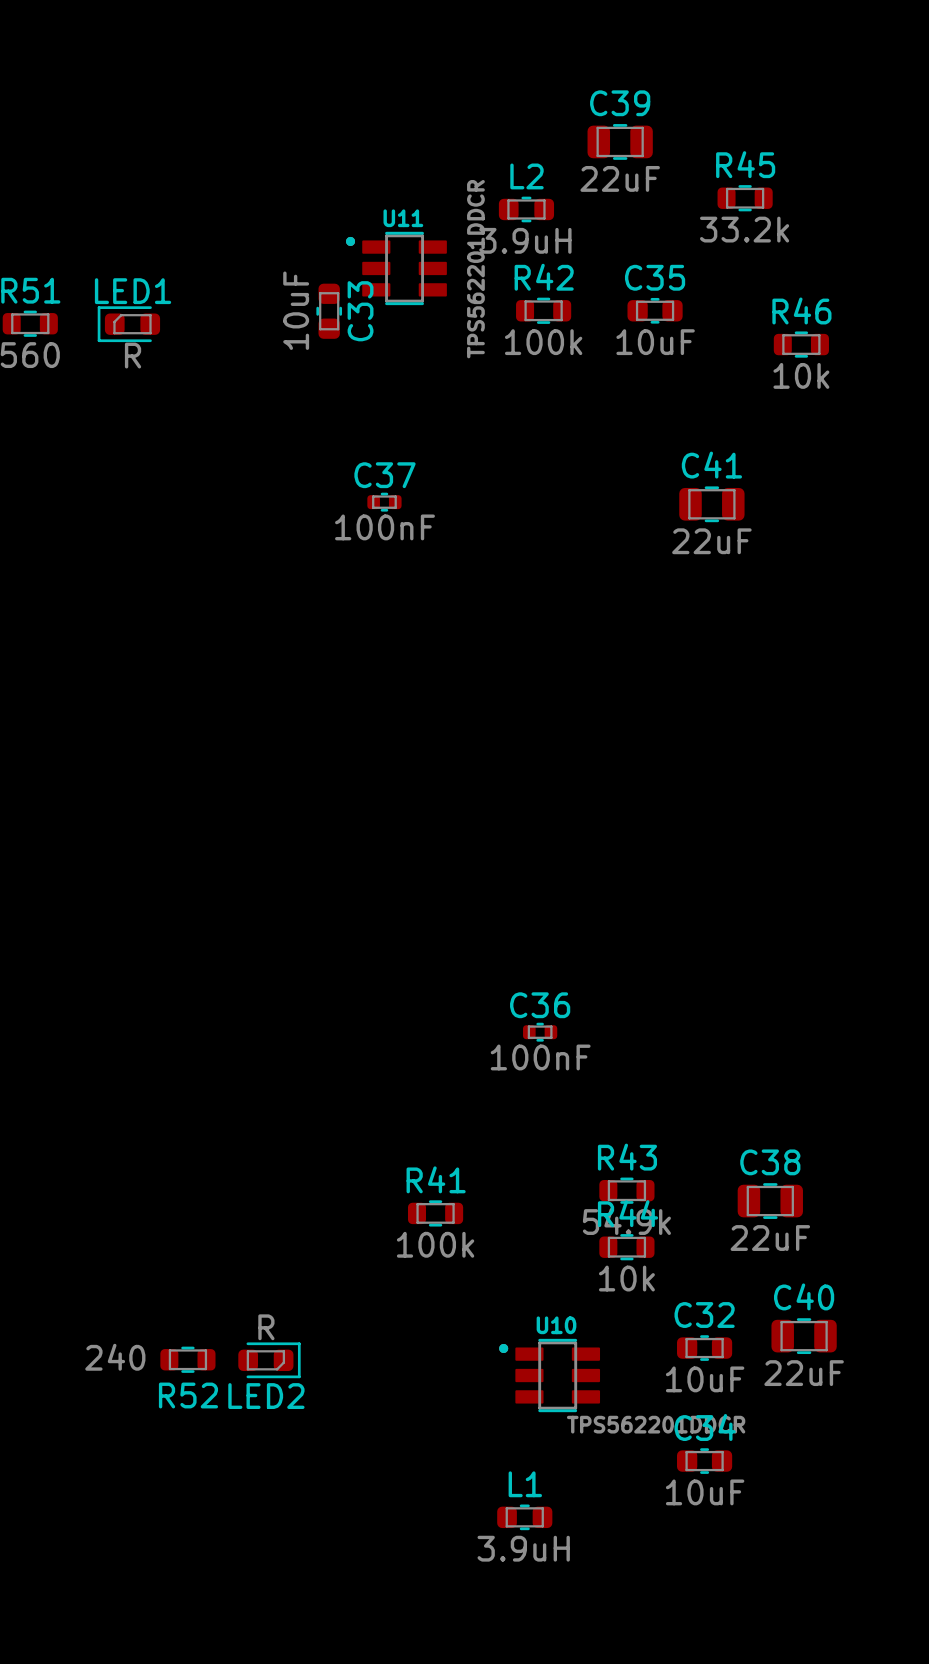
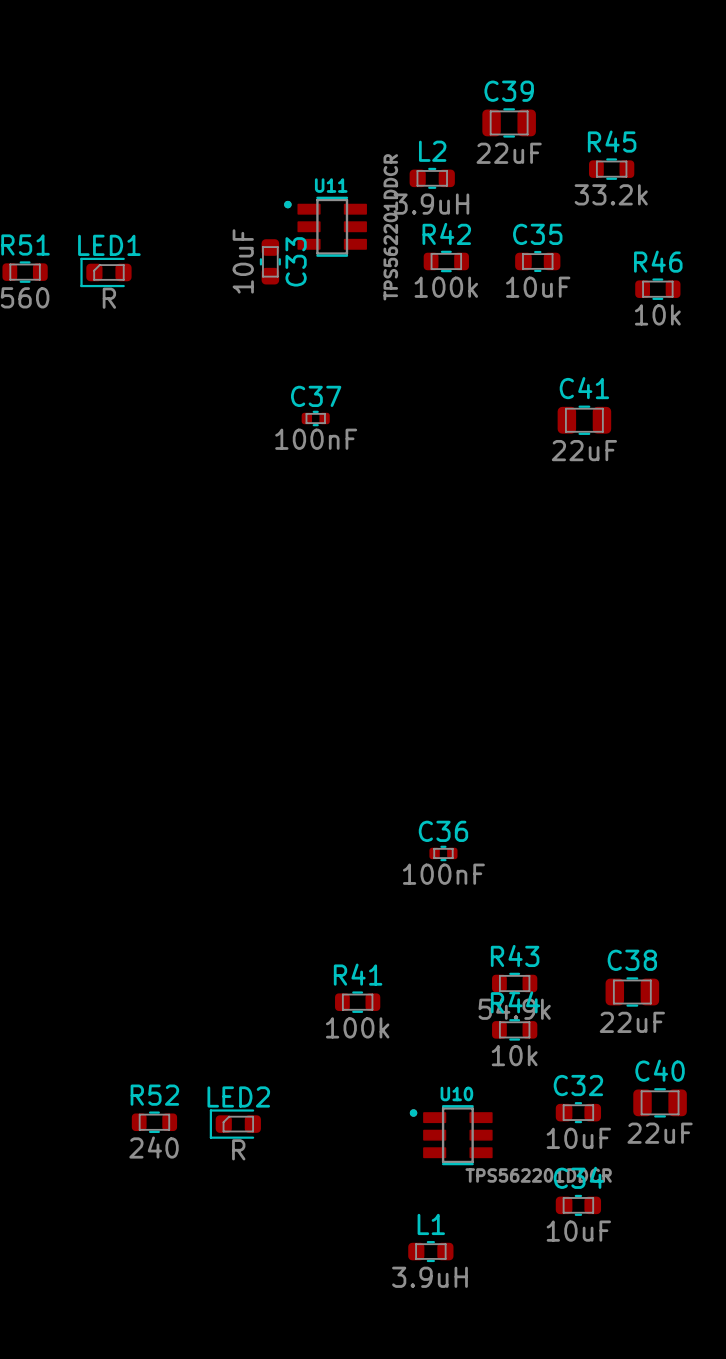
R52 value position: 240 (115, 1357) -> 240 (154, 1147)
LED2 rotation: 0° (269, 1360) -> 180° (235, 1124)
R52 name position: R52 (188, 1395) -> R52 (154, 1095)

